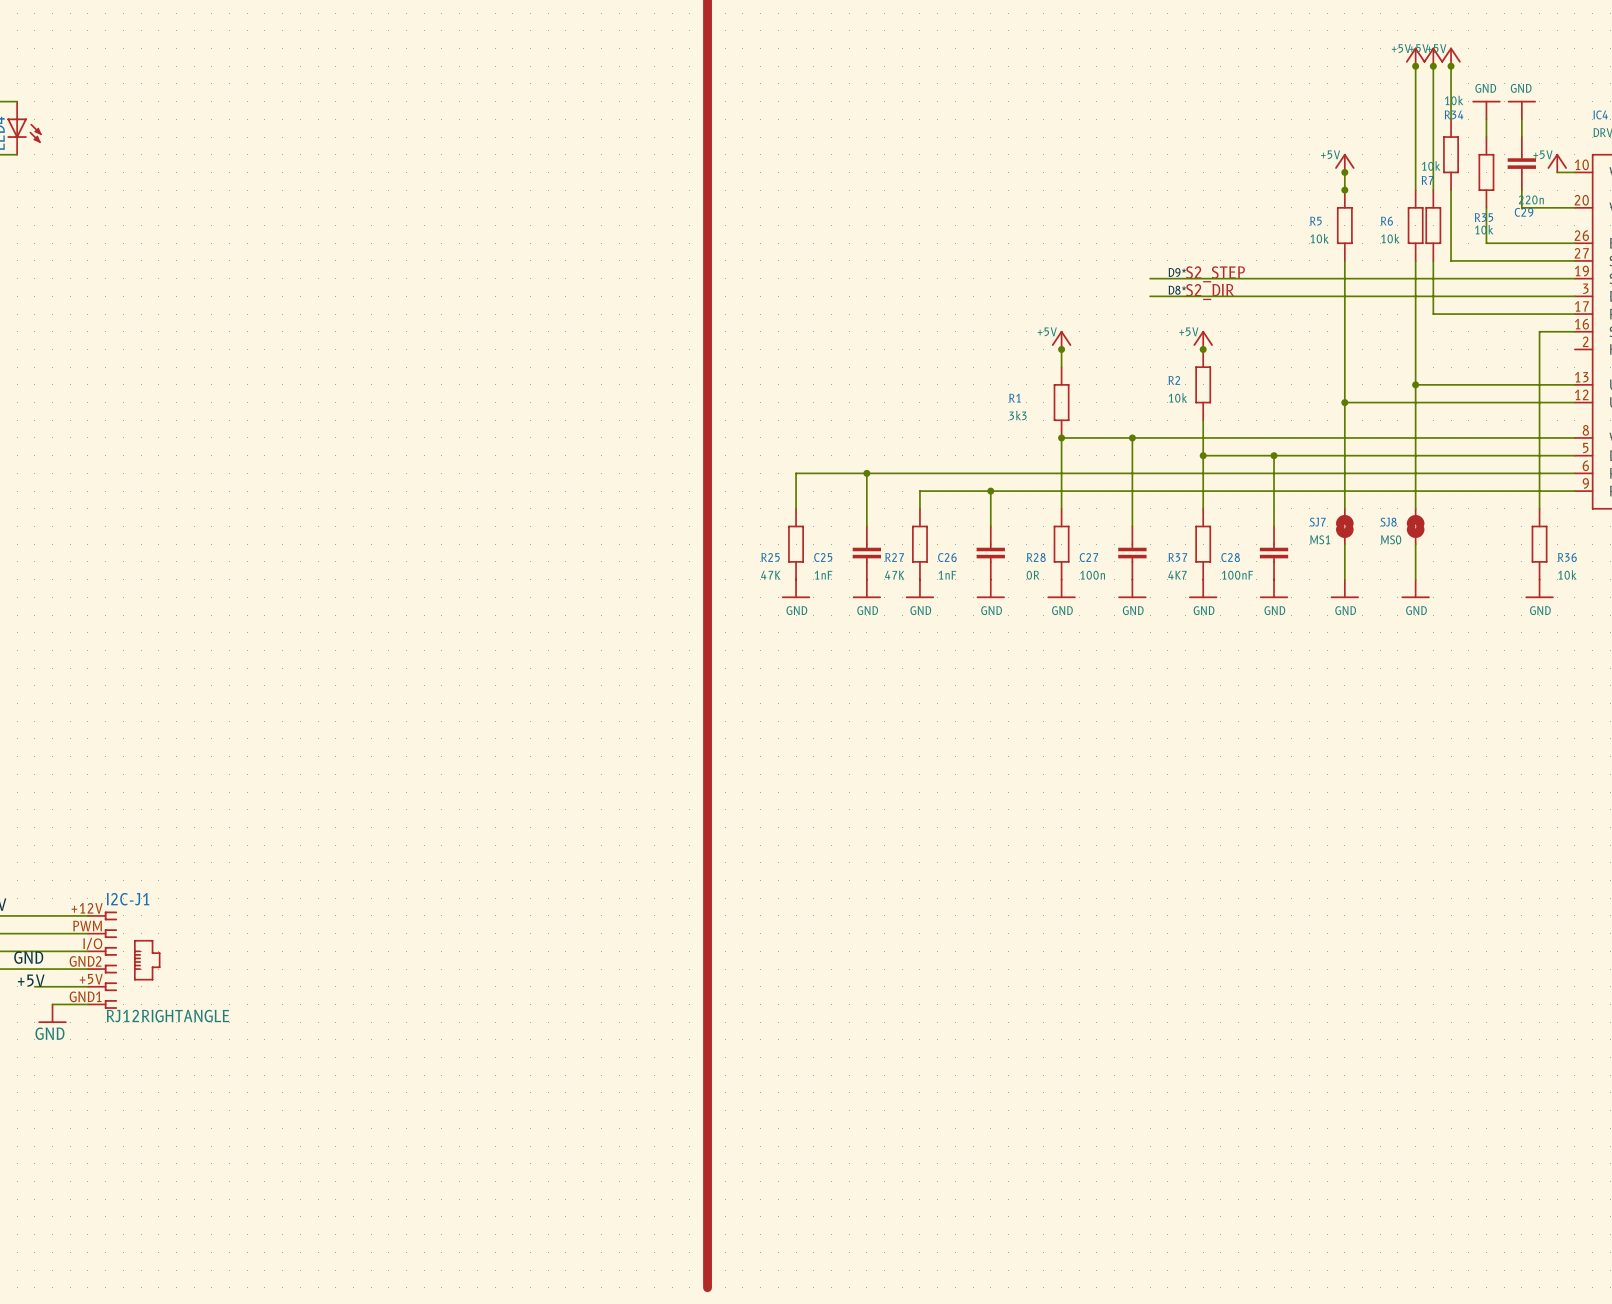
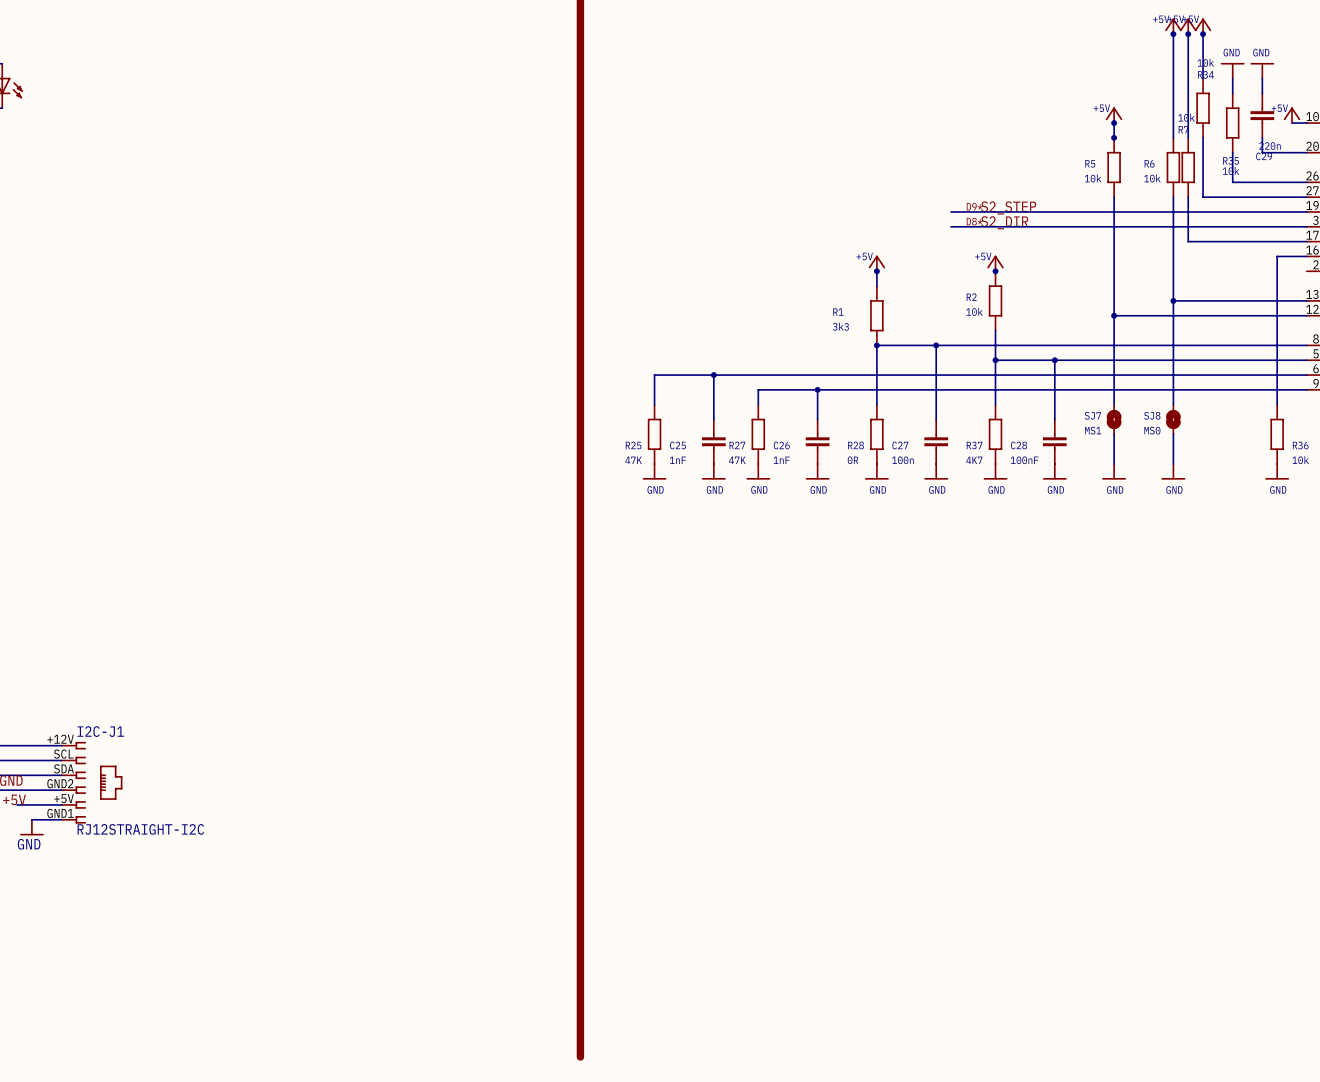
I2C-J1 pin number: PWM (87, 925) -> SCL (63, 754)
I2C-J1 pin number: I/O (92, 943) -> SDA (63, 768)
I2C-J1 value: RJ12RIGHTANGLE (168, 1016) -> RJ12STRAIGHT-I2C (140, 829)

